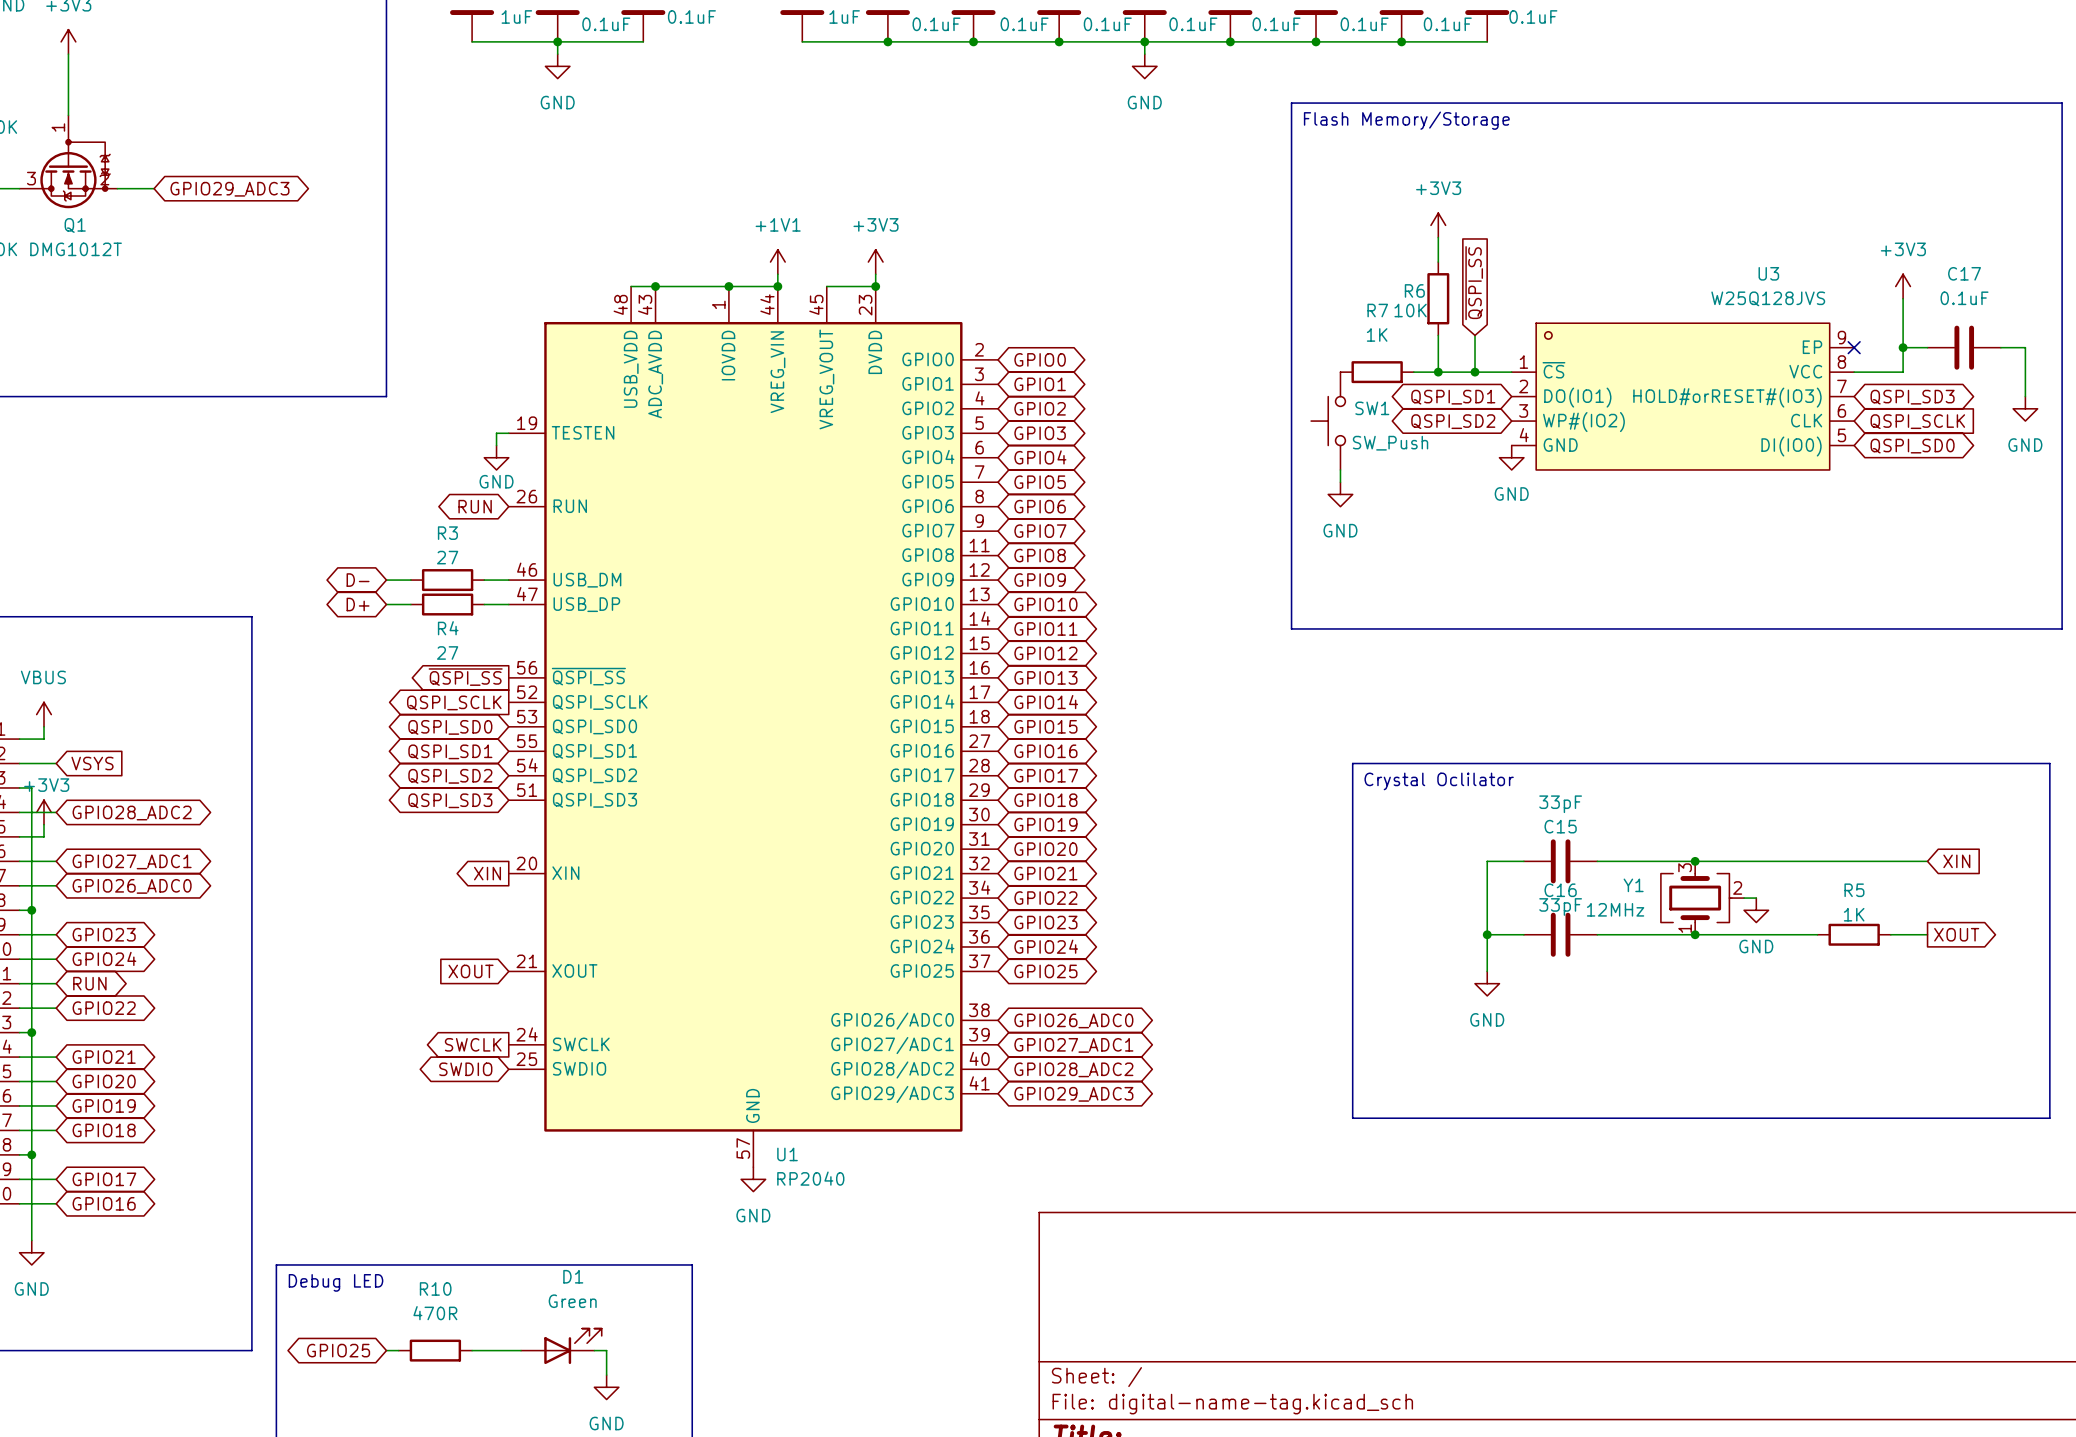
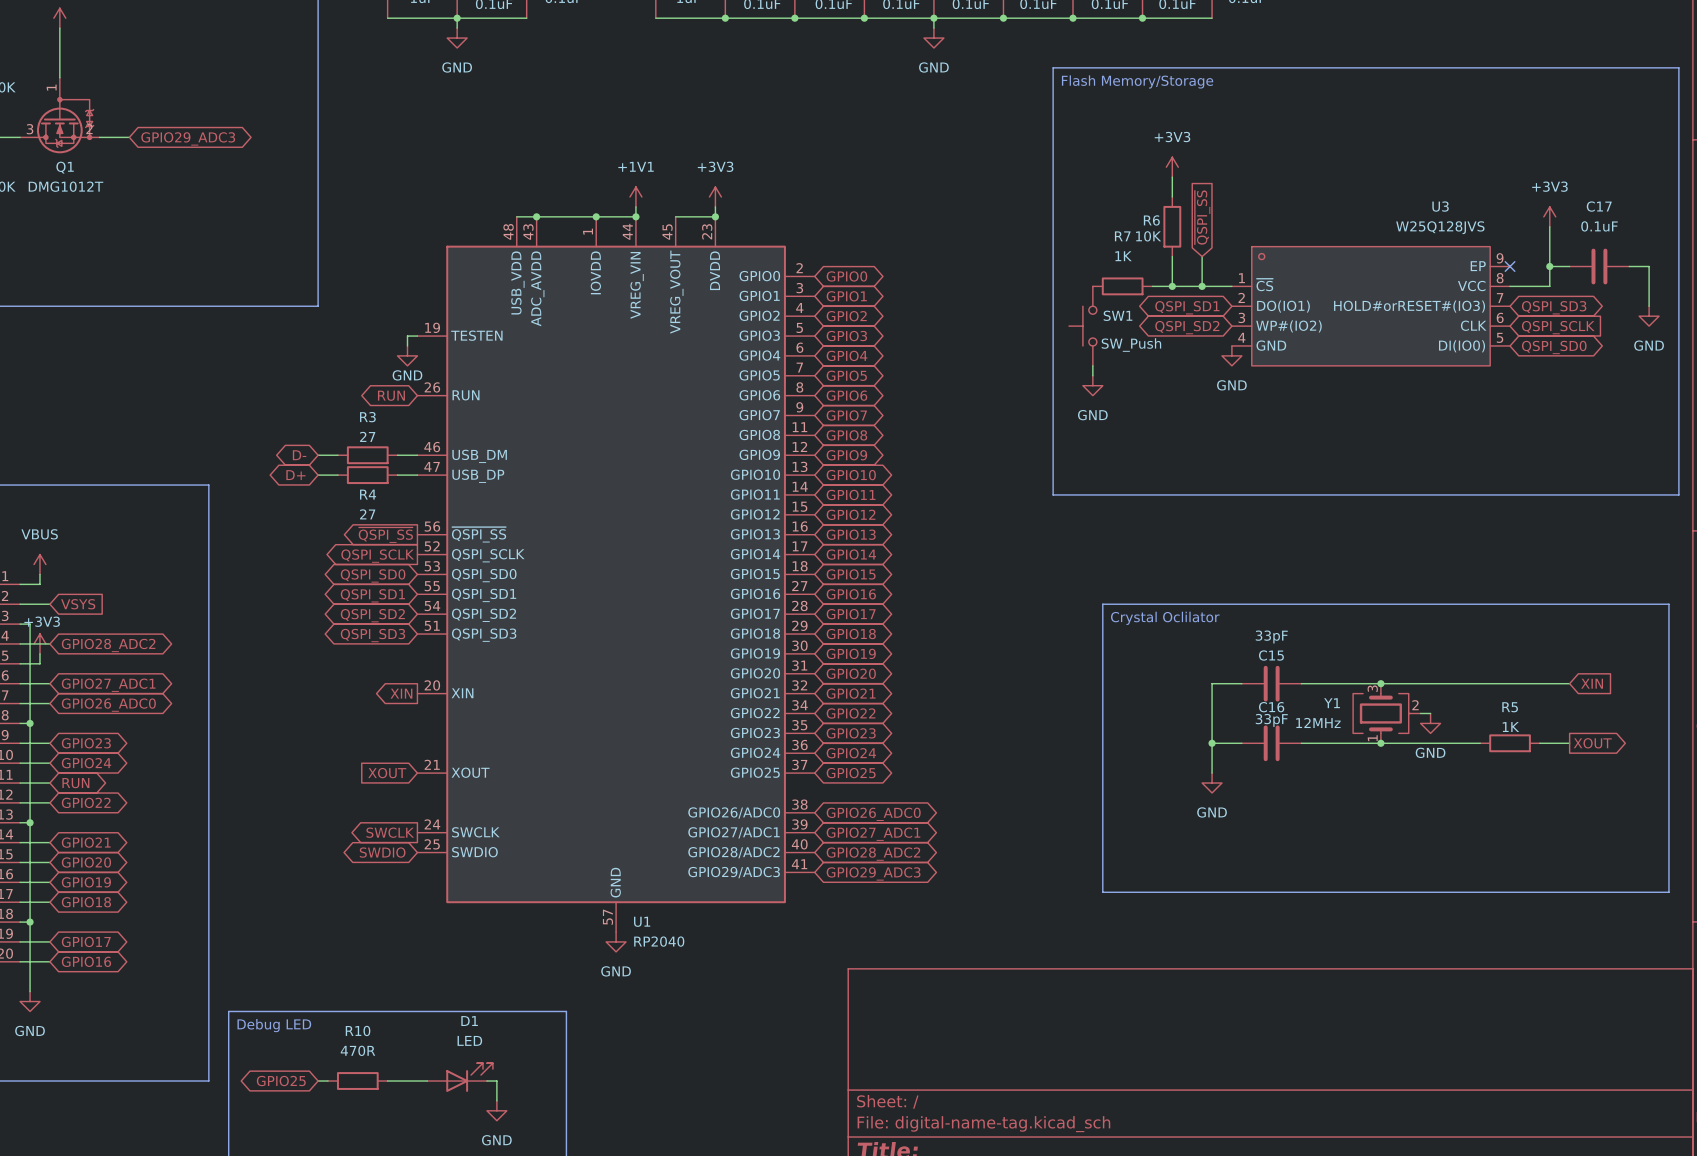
D1 value: Green (572, 1301) -> LED (469, 1040)

